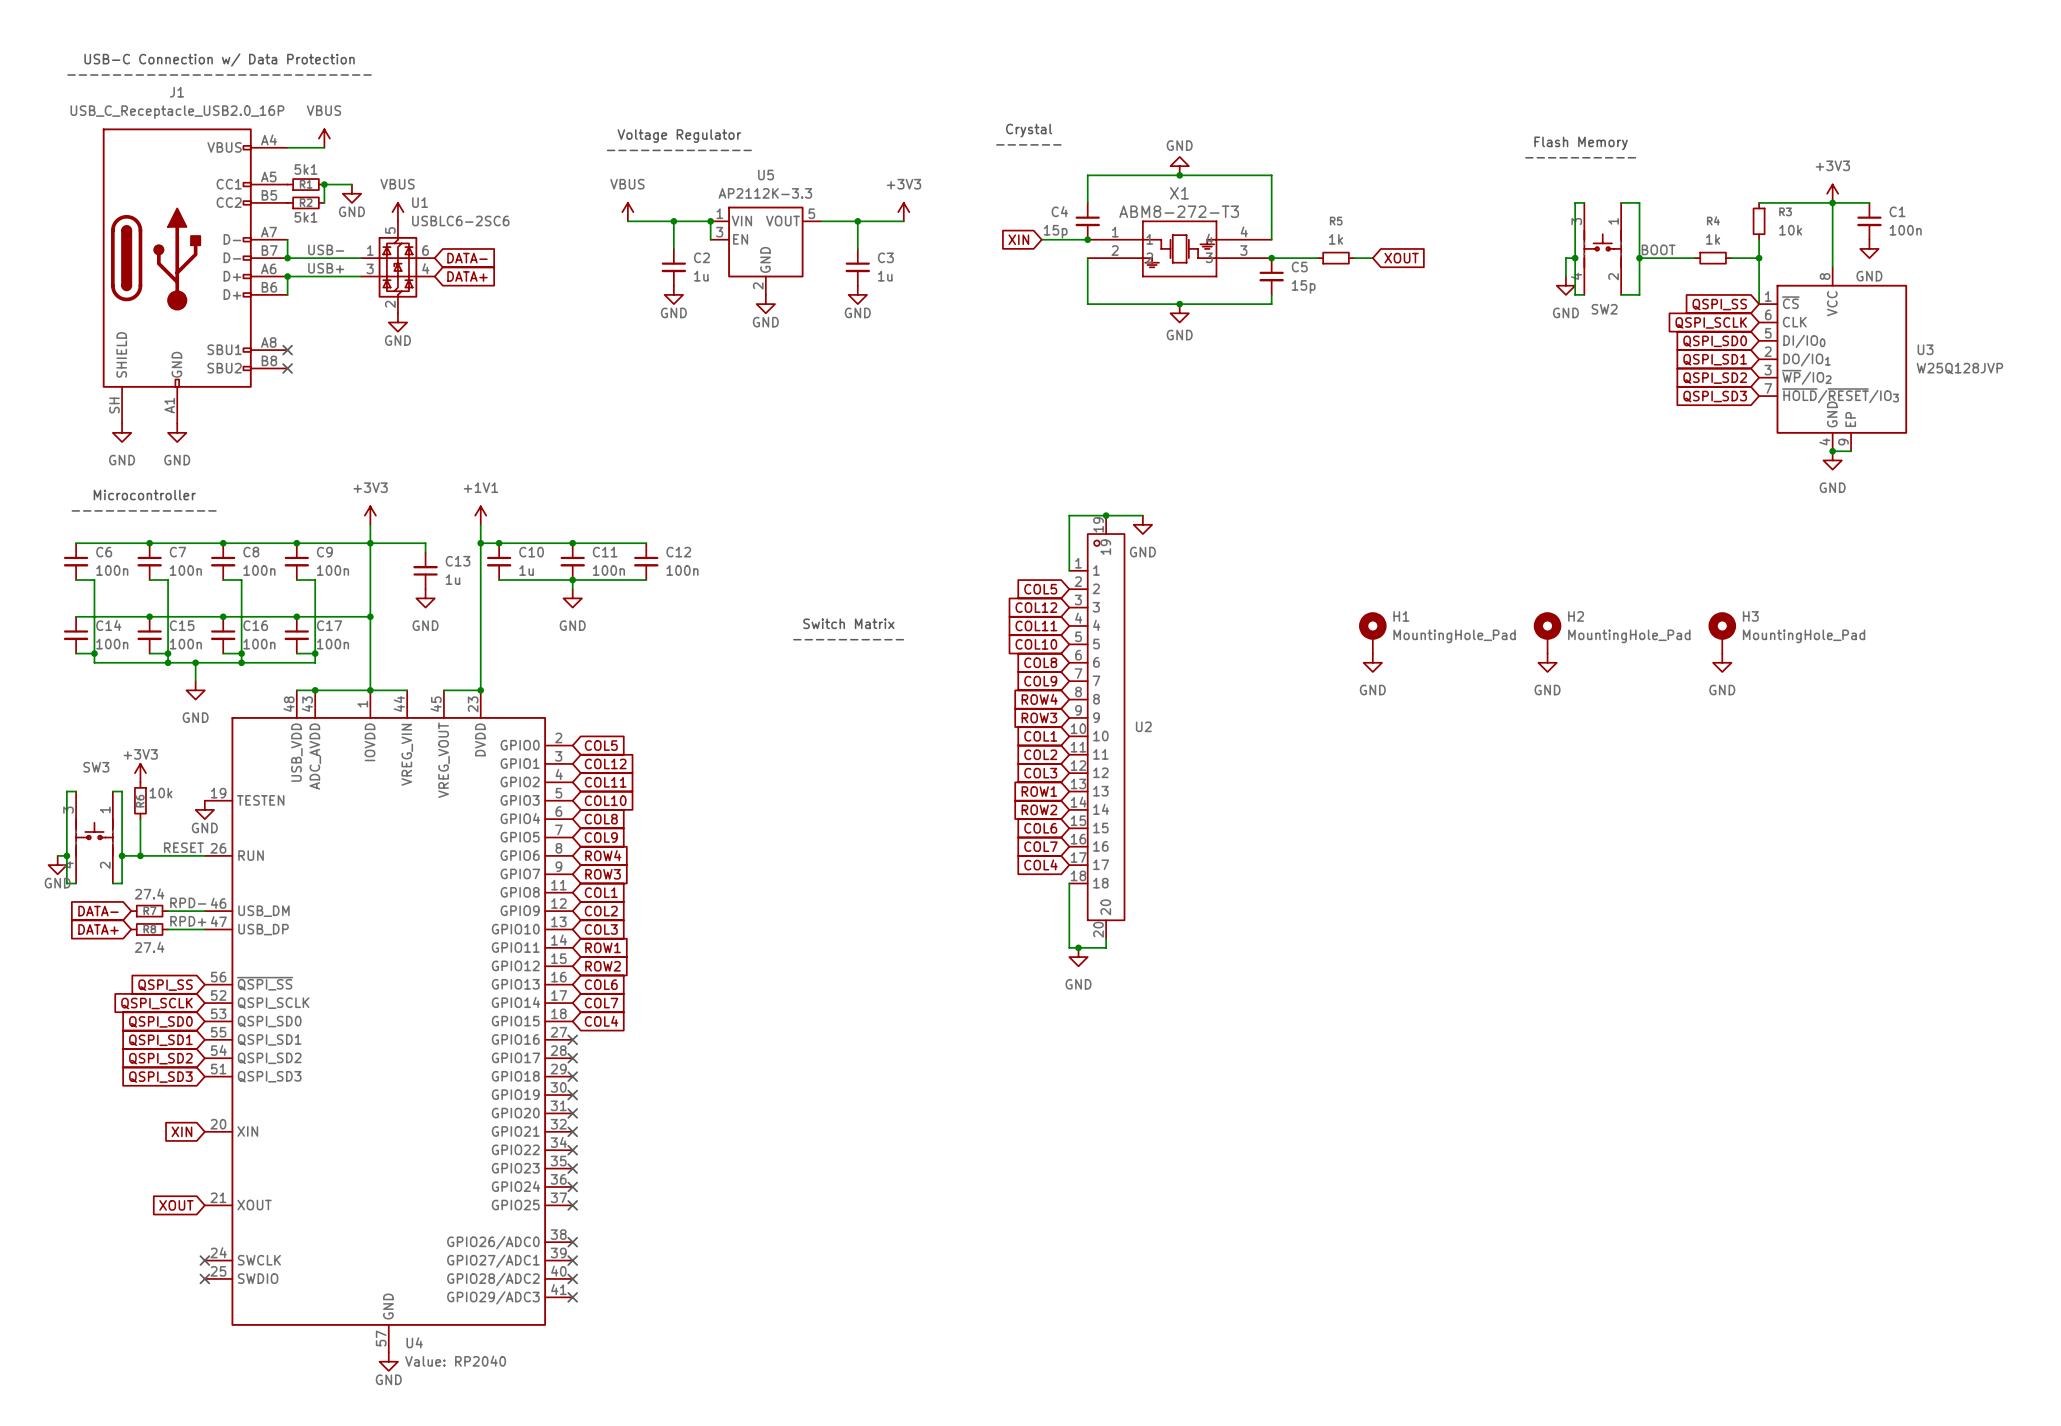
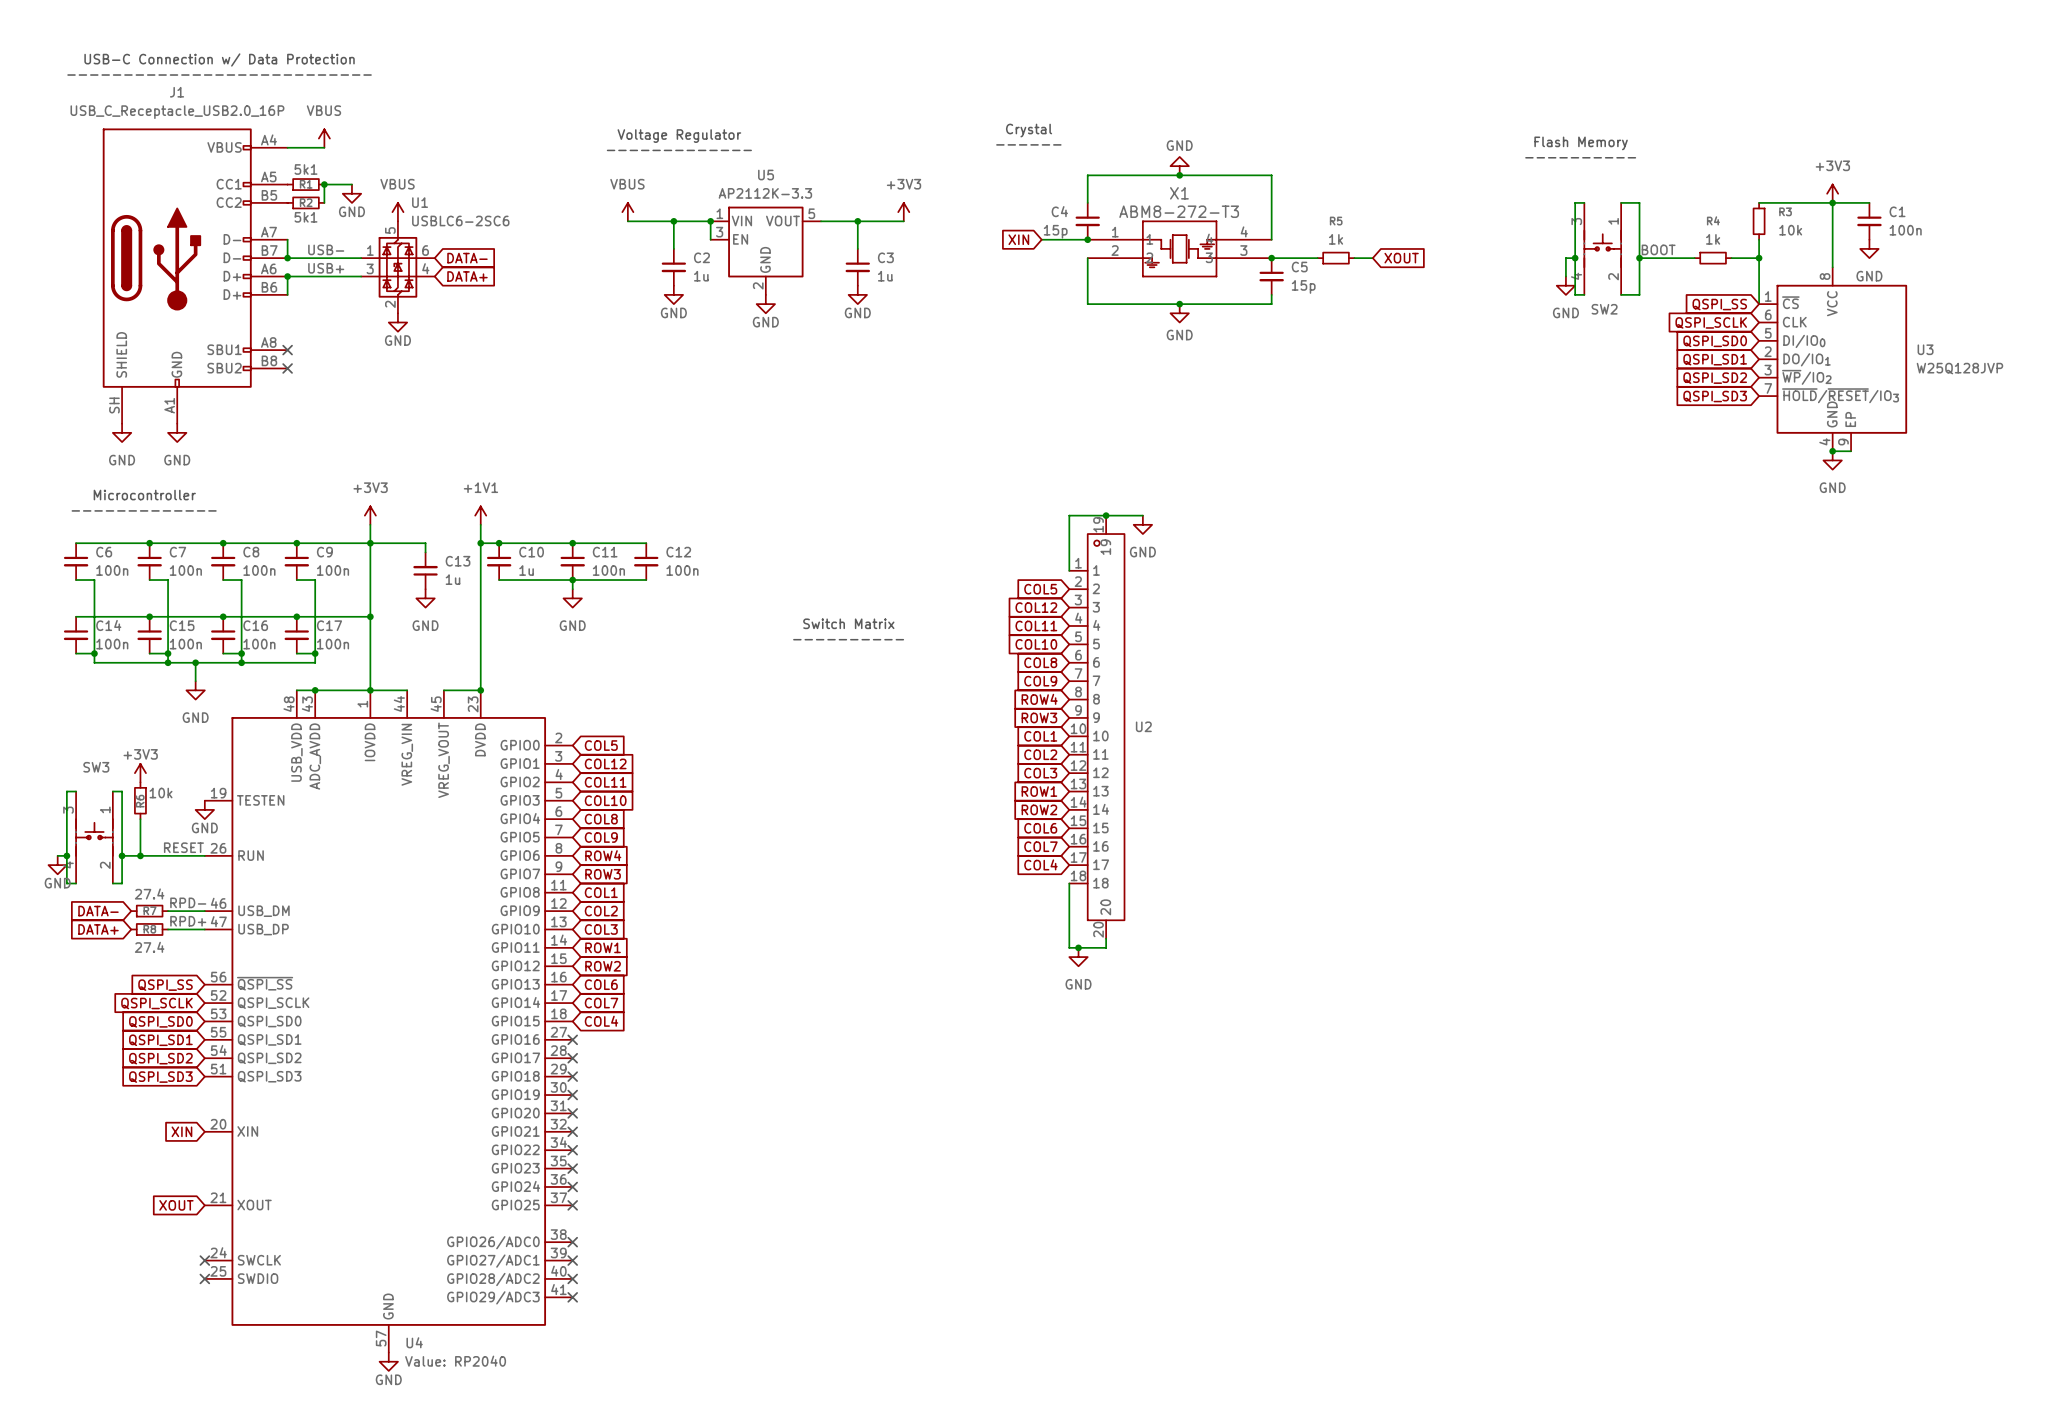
H1: MountingHole_Pad (1372, 632) -> none
H2: MountingHole_Pad (1547, 632) -> none
H3: MountingHole_Pad (1722, 632) -> none
power symbol: GND (1372, 662) -> none
power symbol: GND (1547, 662) -> none
power symbol: GND (1722, 662) -> none

